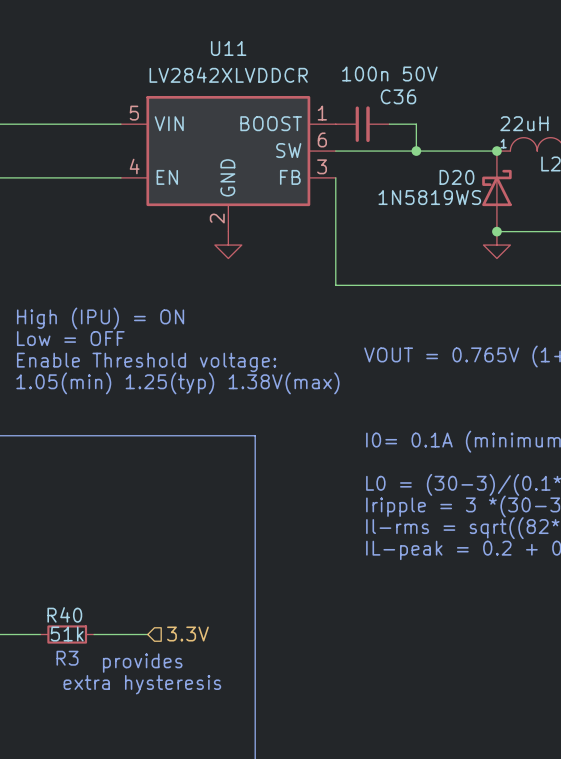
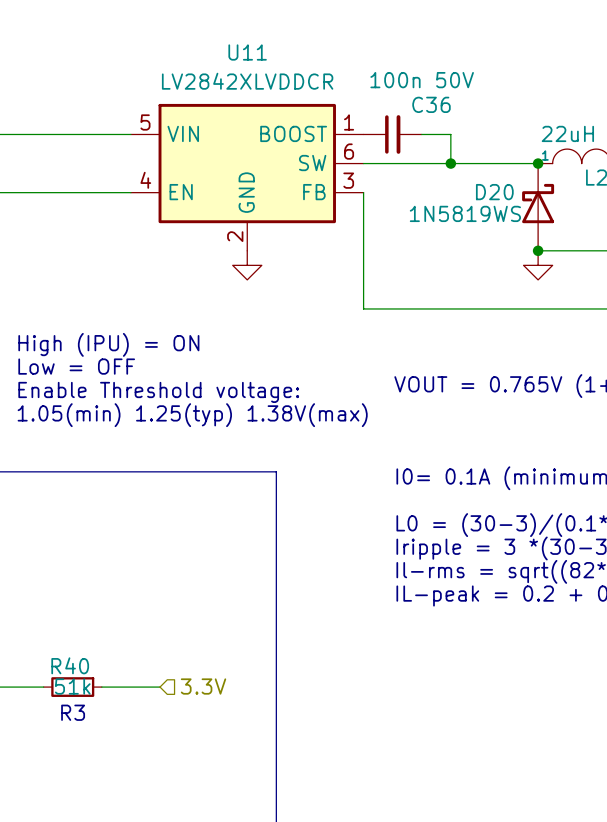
text: provides (142, 663) -> none
text: extra hysteresis (142, 684) -> none

